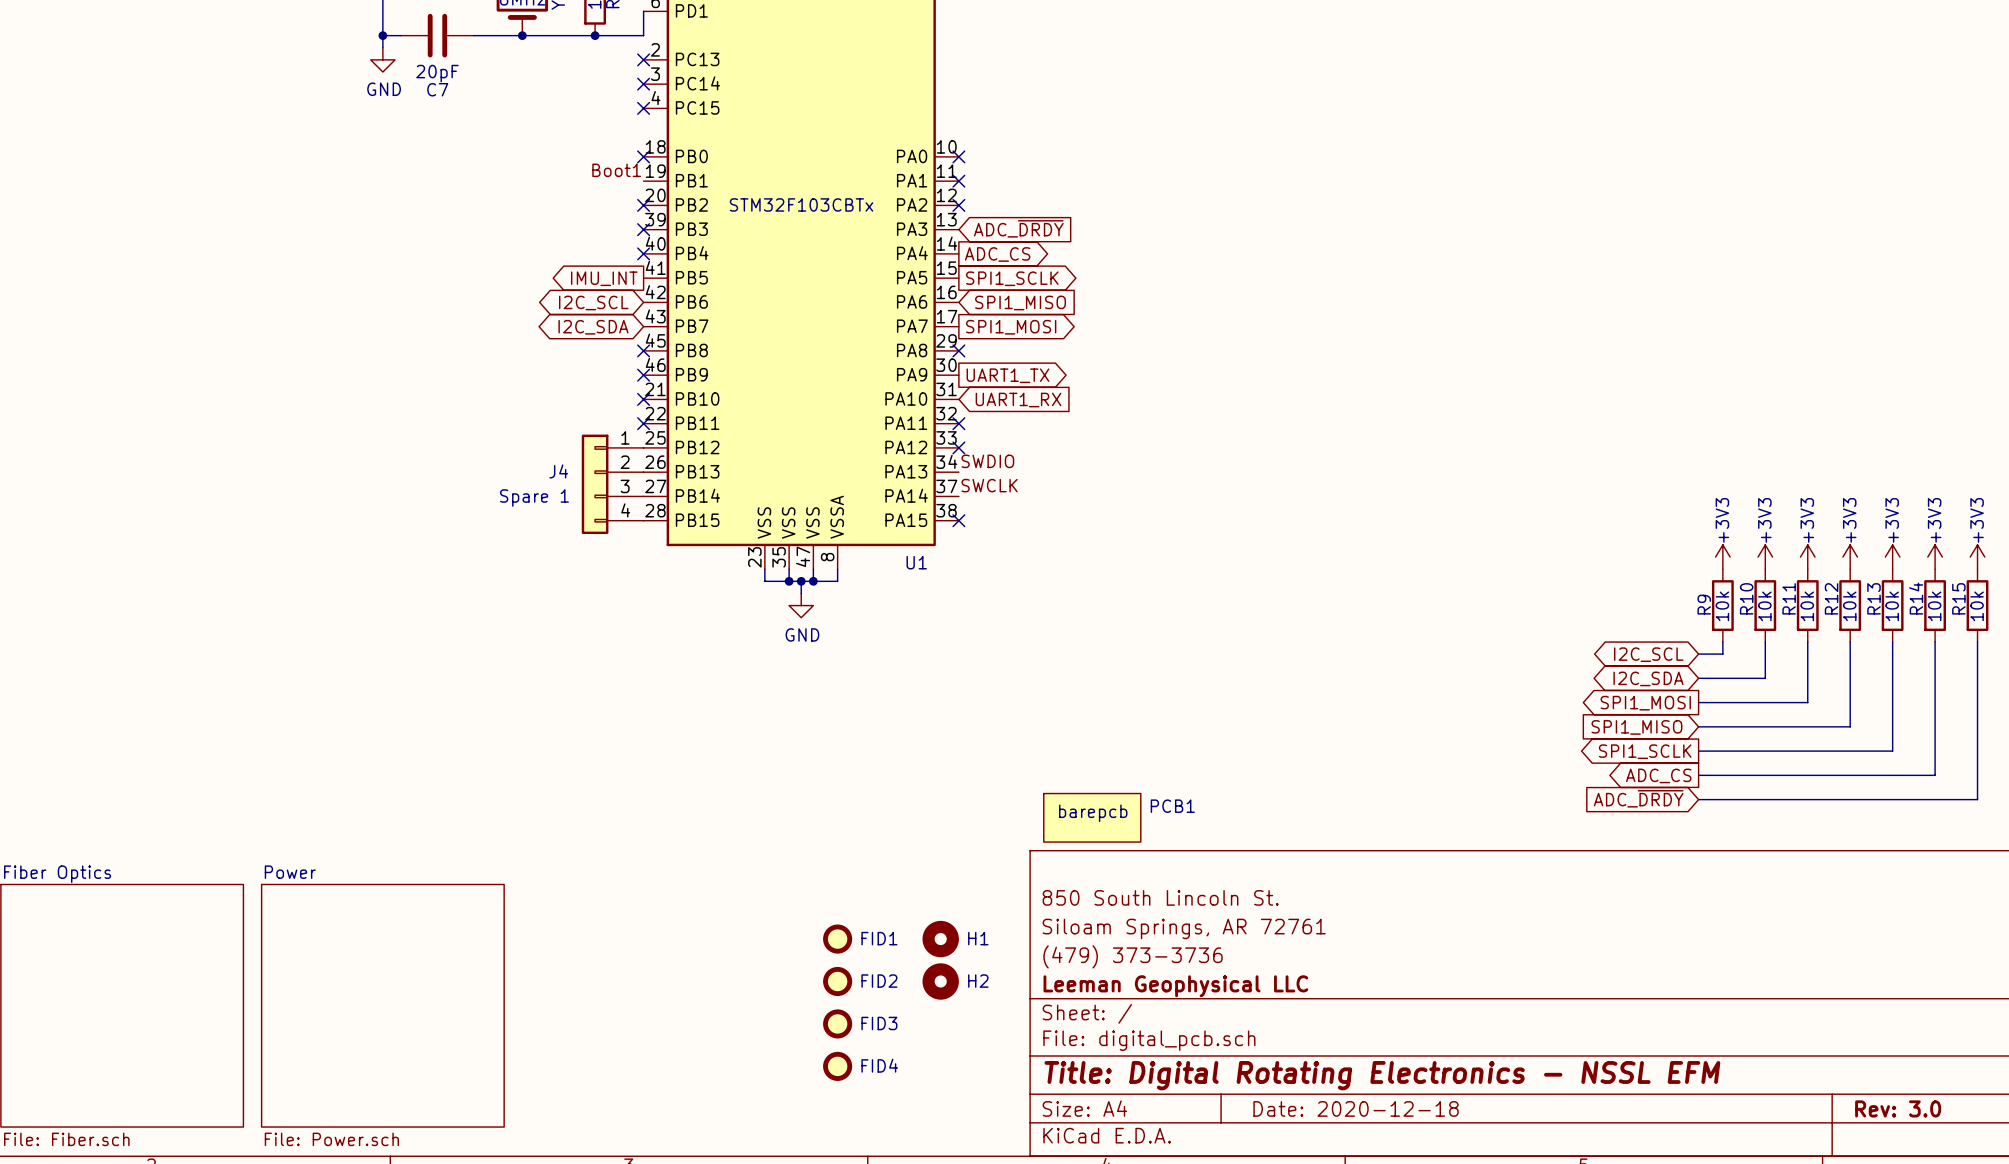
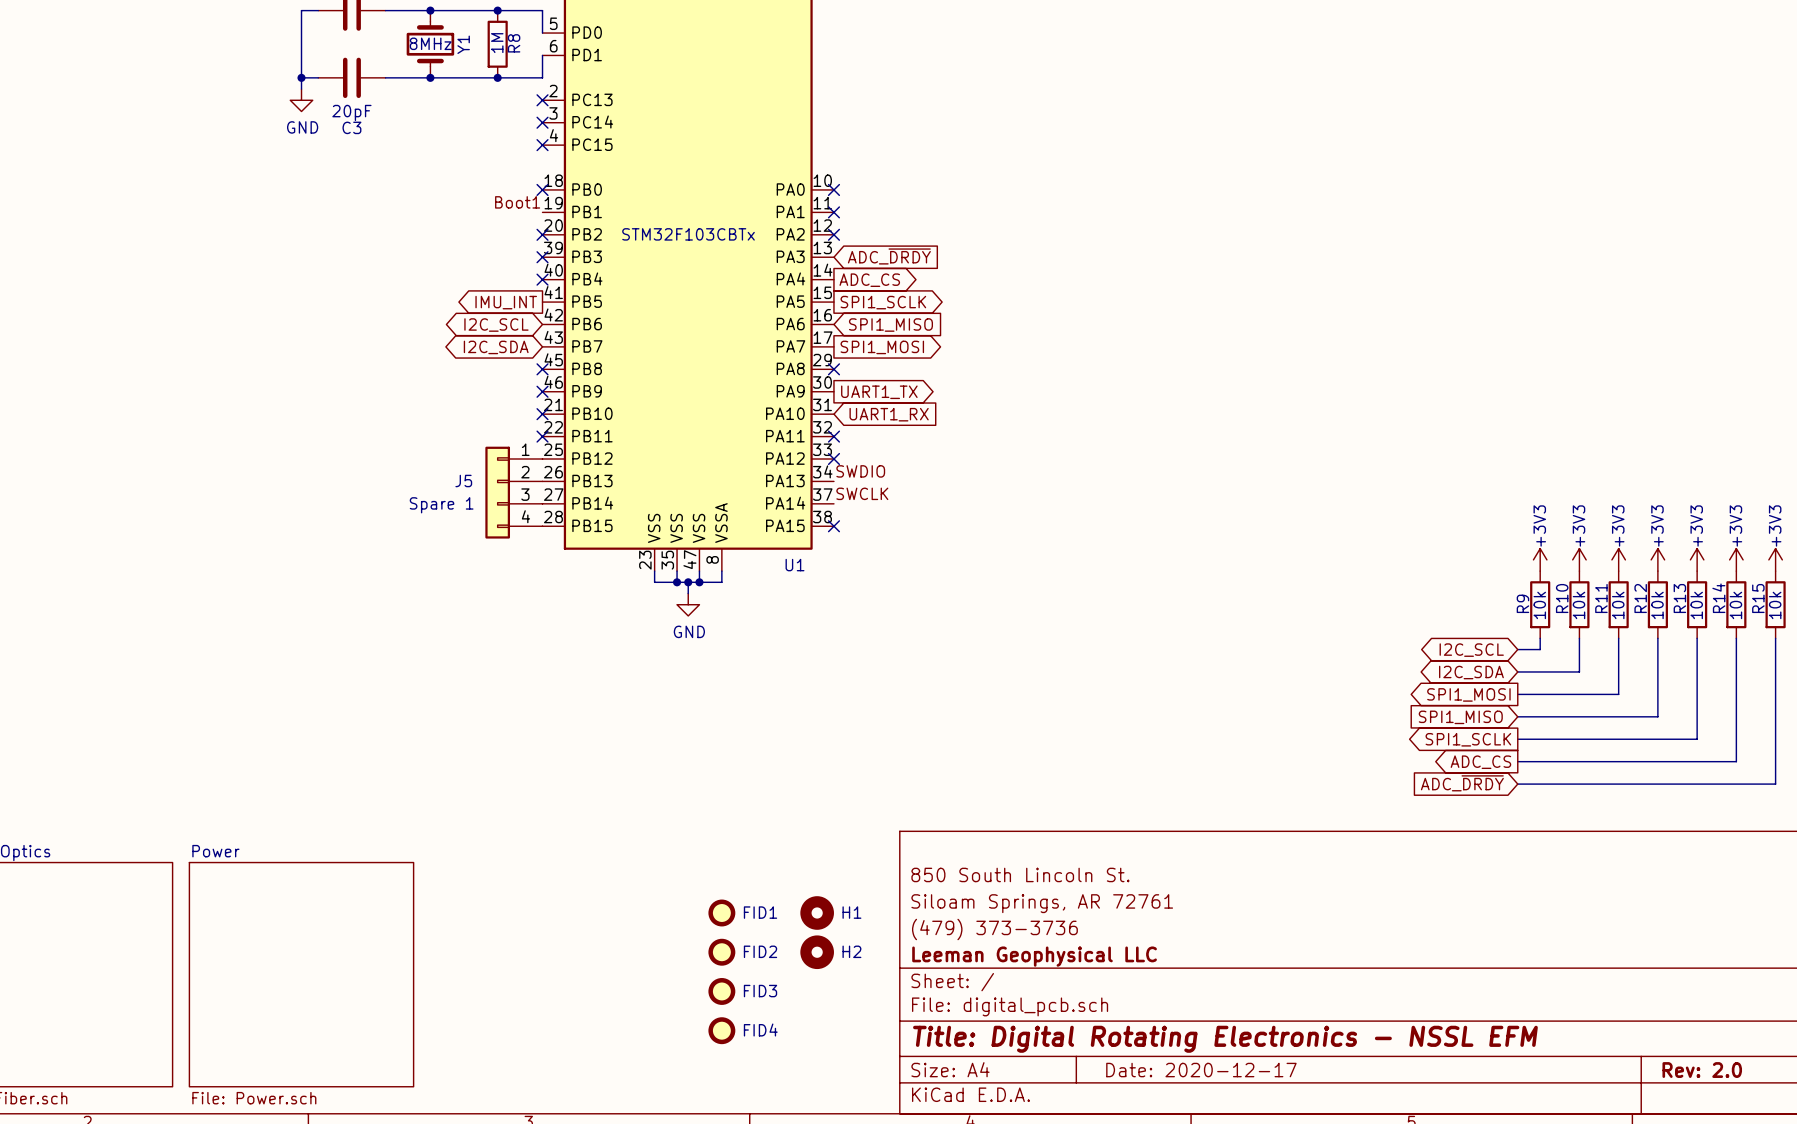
C7 name: C7 (437, 89) -> C3 (351, 127)
J4 name: J4 (558, 471) -> J5 (463, 481)
PCB1: barepcb (1092, 817) -> none
title block: Date: 2020-12-18 (1356, 1108) -> Date: 2020-12-17 (1201, 1070)
title block: Rev: 3.0 (1898, 1108) -> Rev: 2.0 (1702, 1070)

